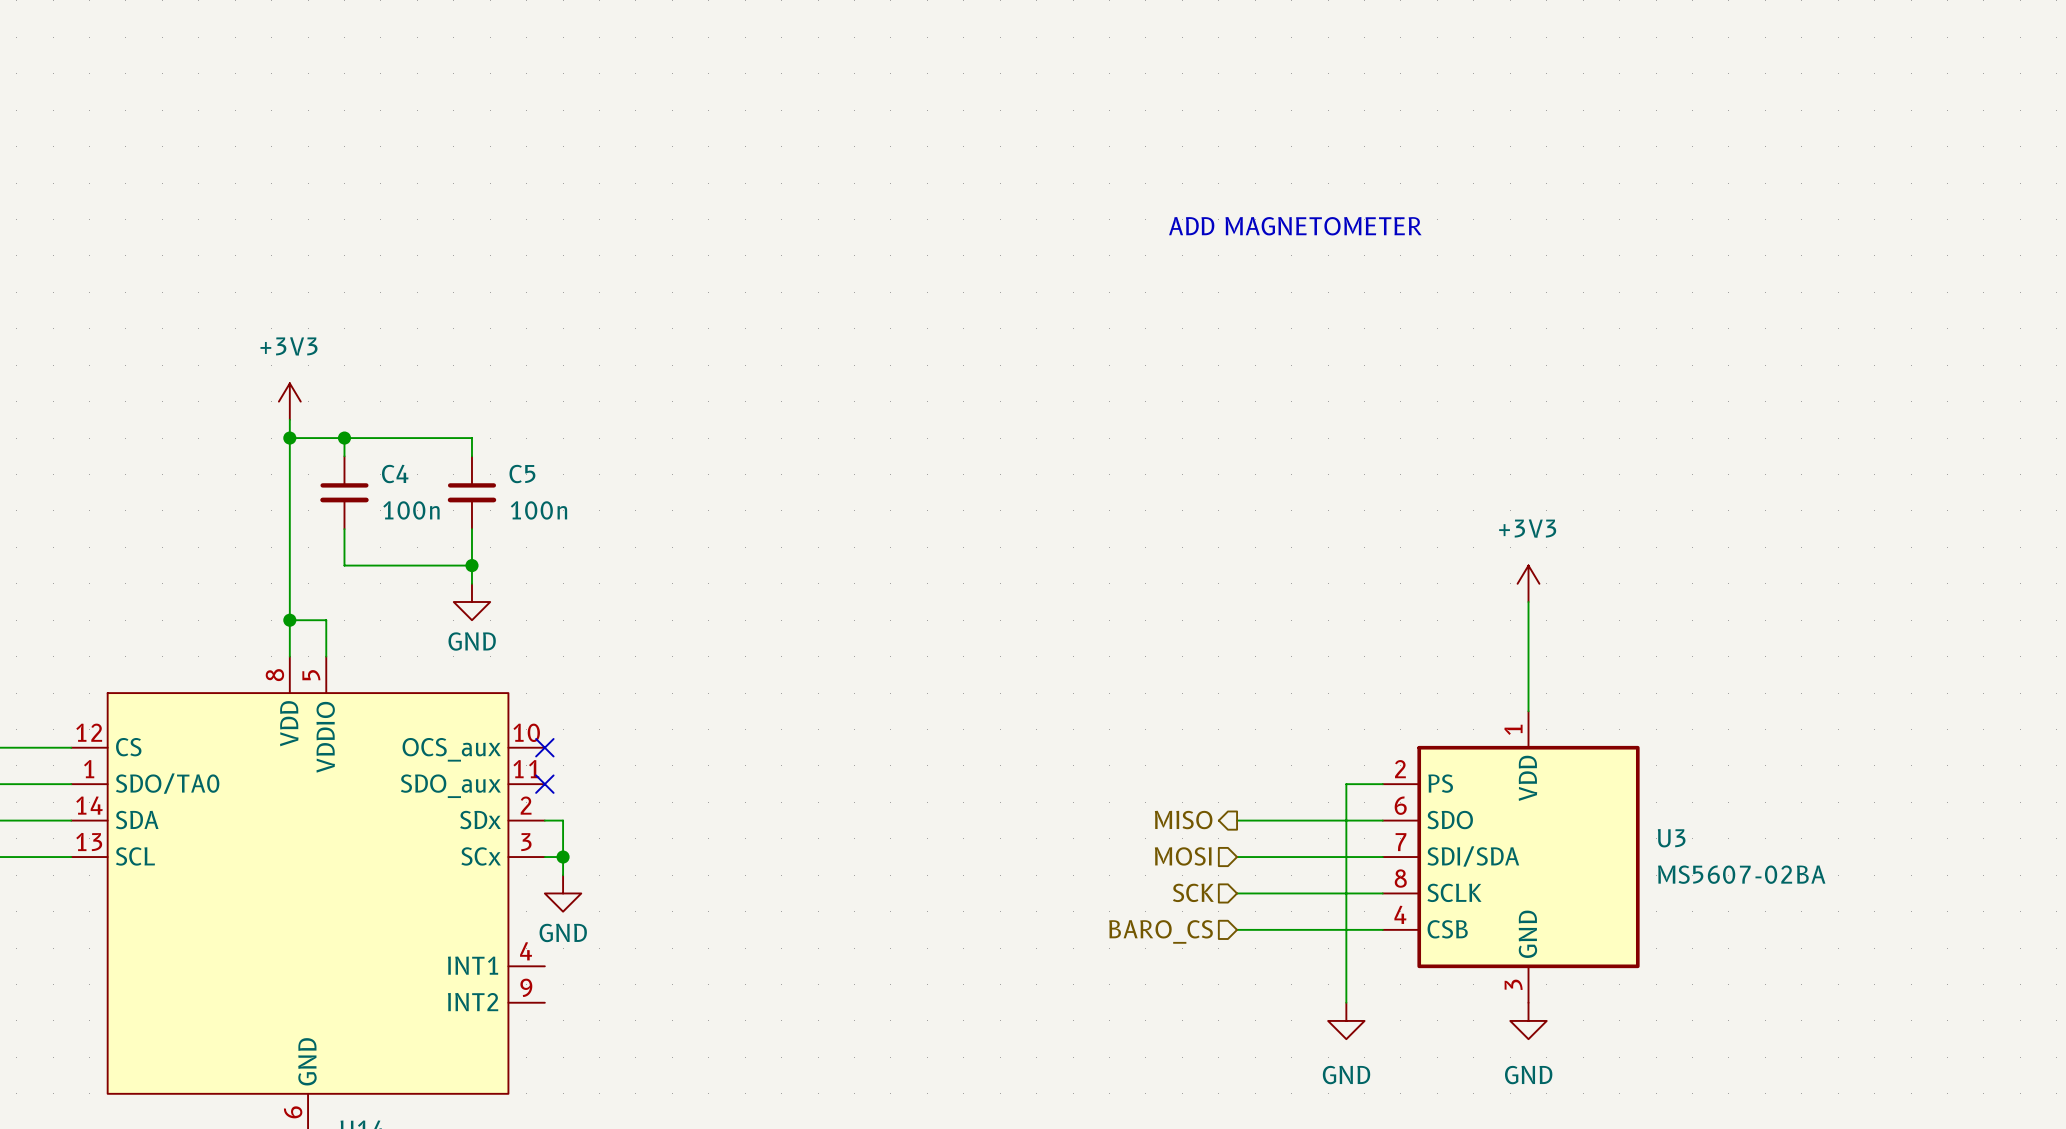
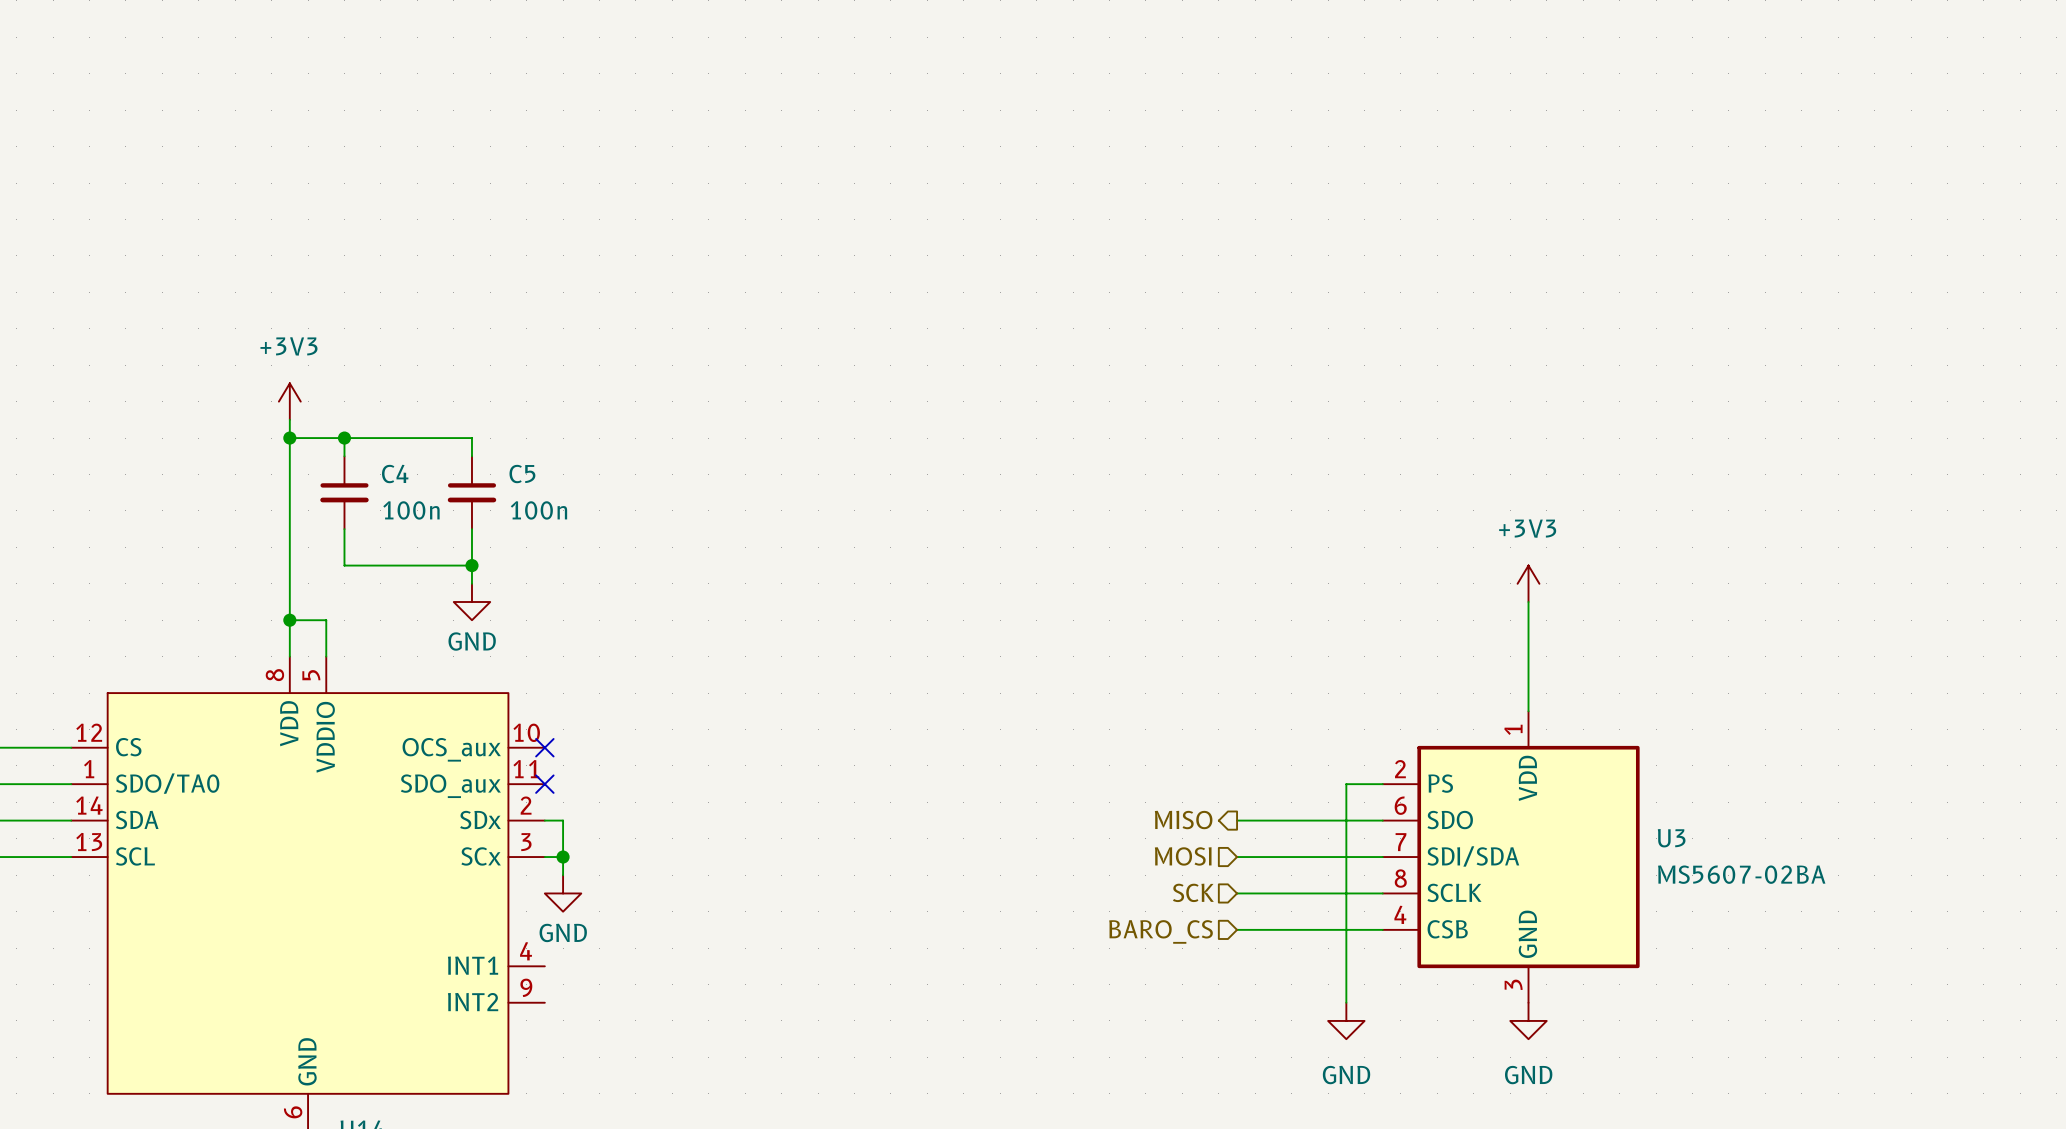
text: ADD MAGNETOMETER (1295, 226) -> none

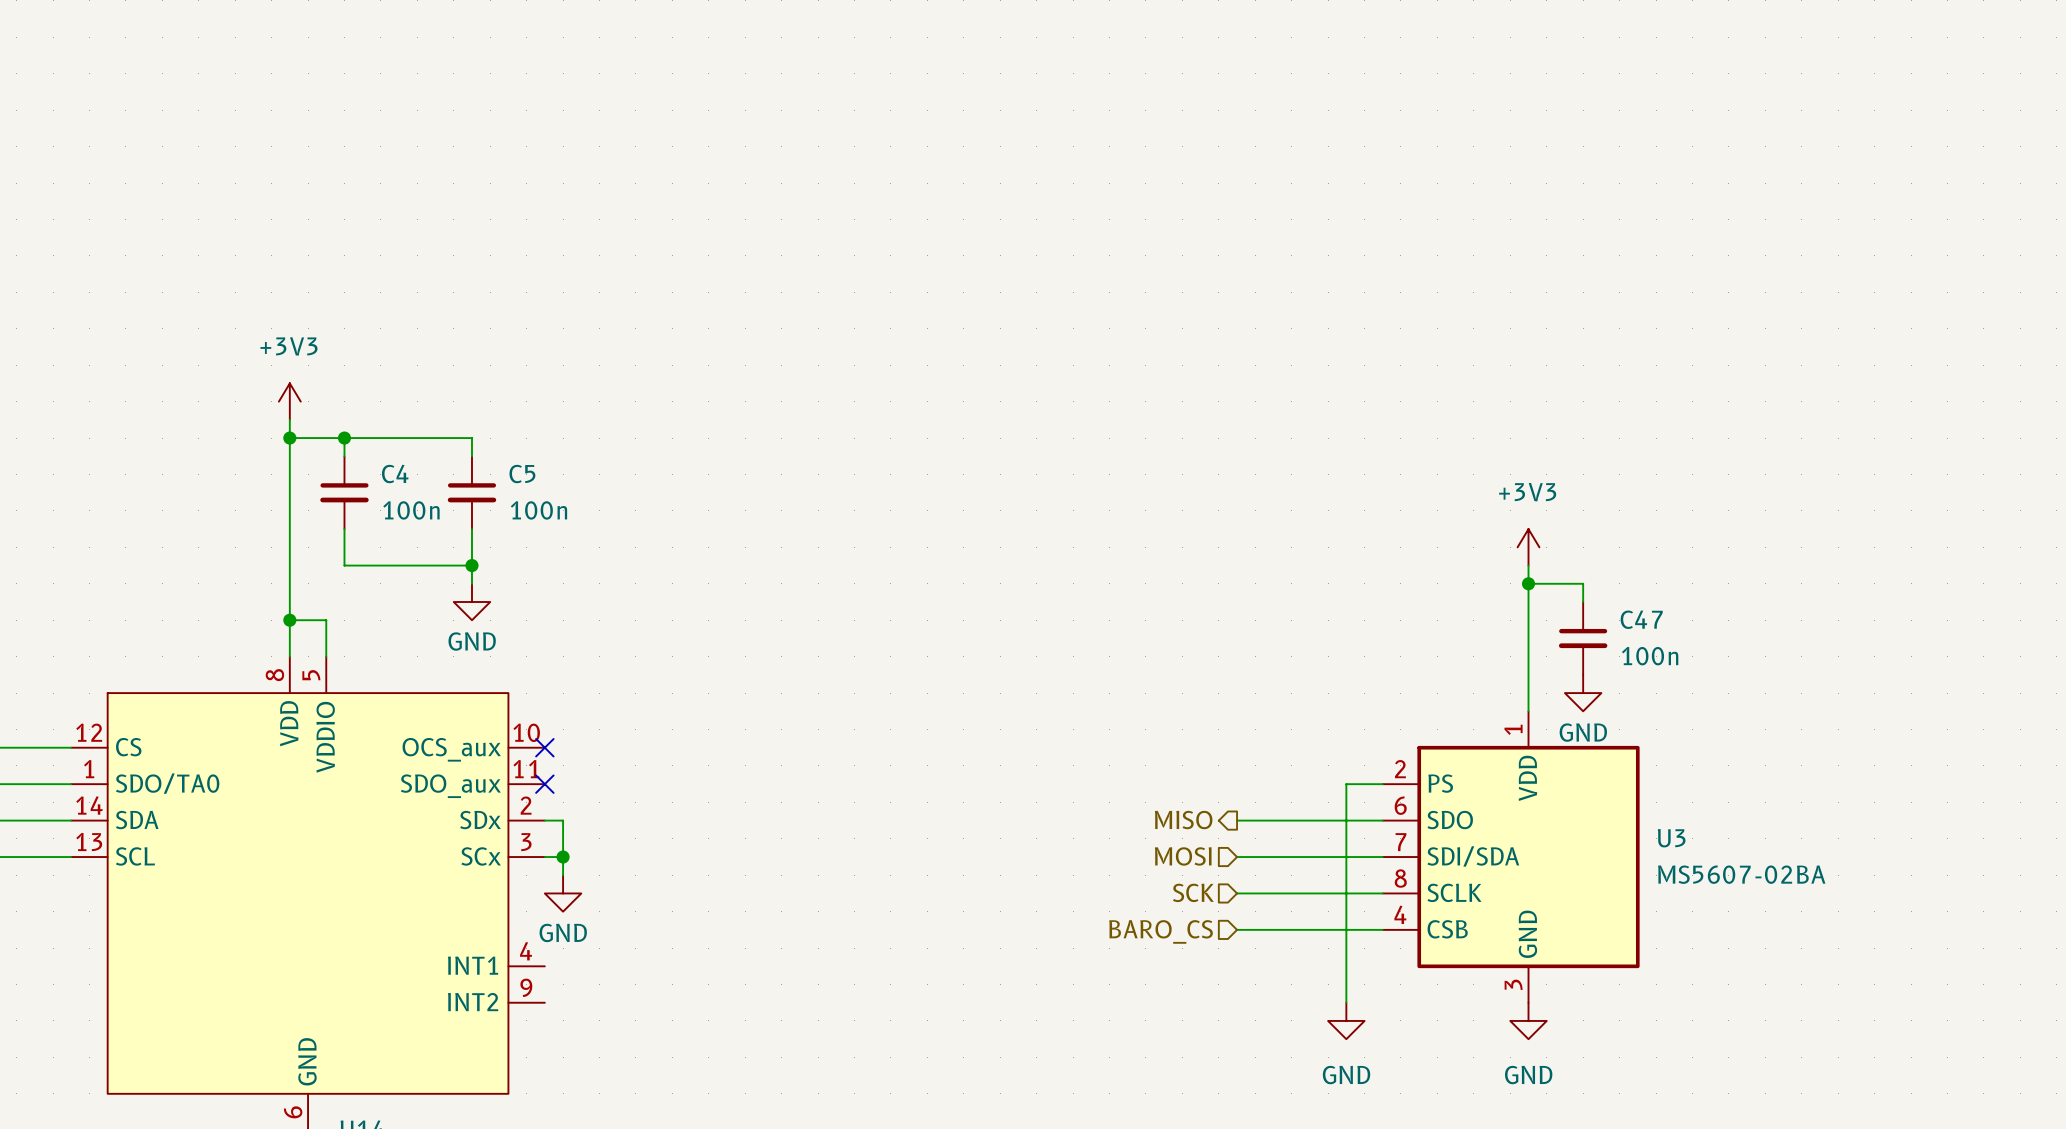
wire: none -> (1528, 583) (1583, 583) (1583, 602)
power symbol position: +3V3 (1528, 583) -> +3V3 (1528, 547)
junction: none -> (1528, 583)
C47: none -> 100n (1583, 638)
power symbol: none -> GND (1583, 693)

